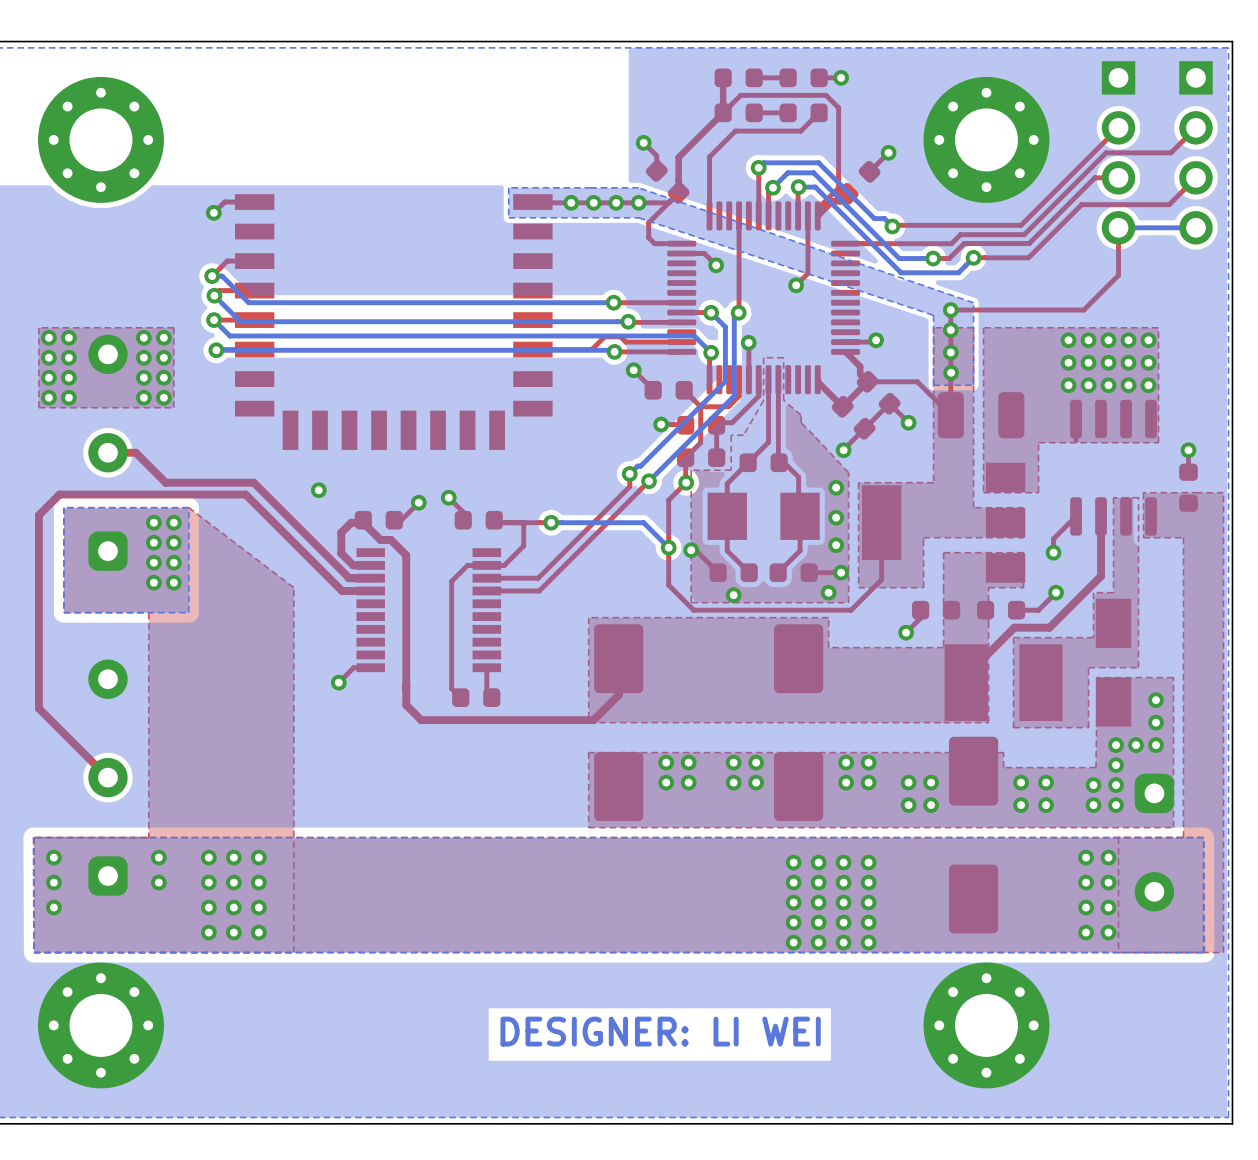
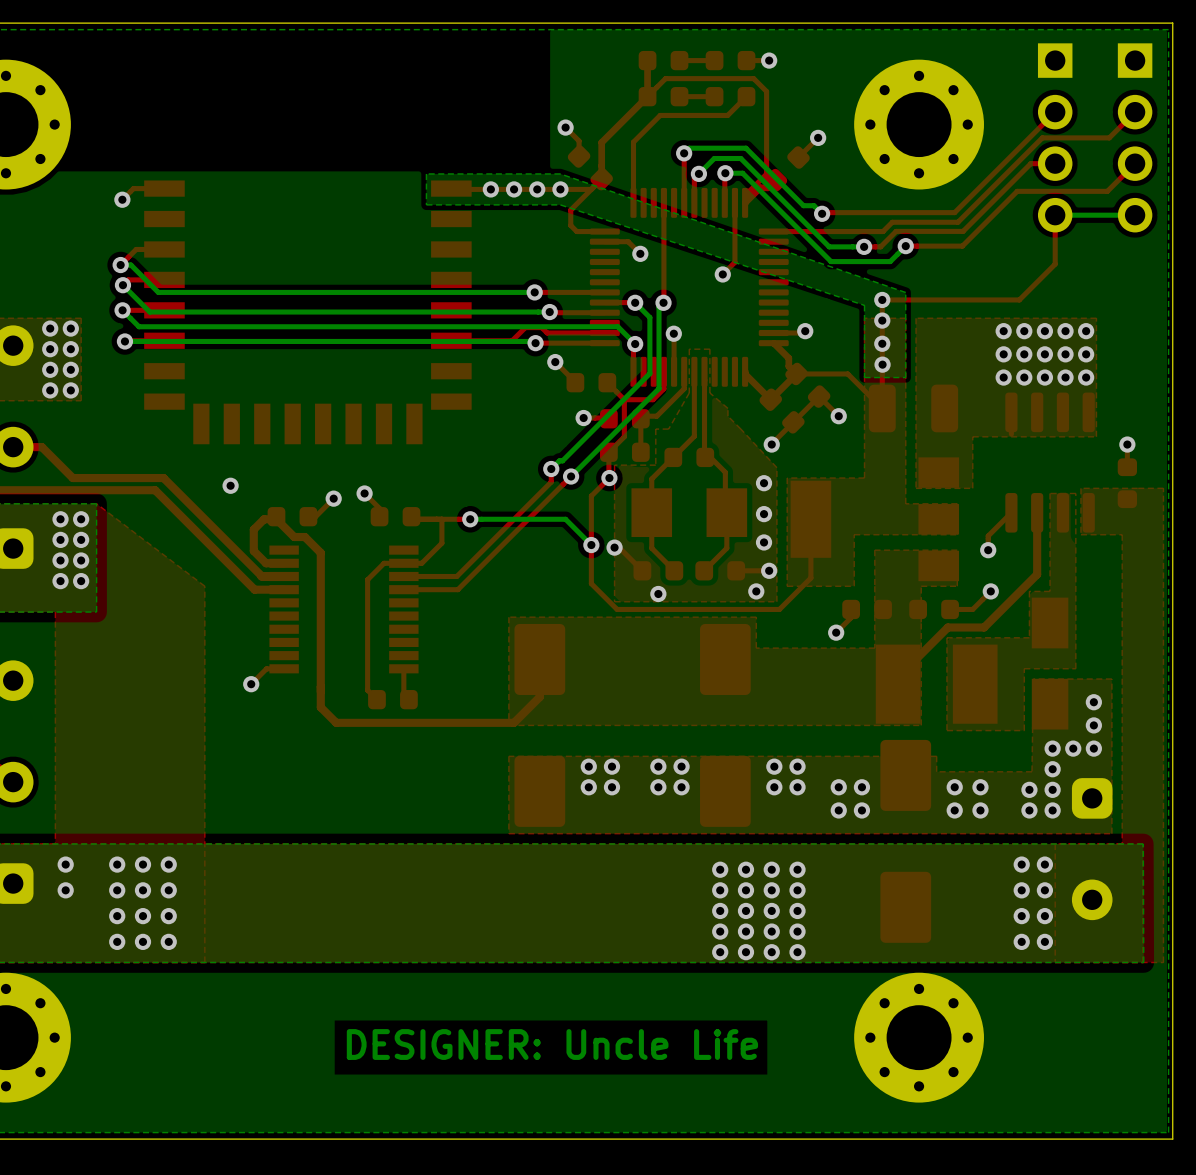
text: DESIGNER: LI WEI (660, 1031) -> DESIGNER: Uncle Life (552, 1044)

